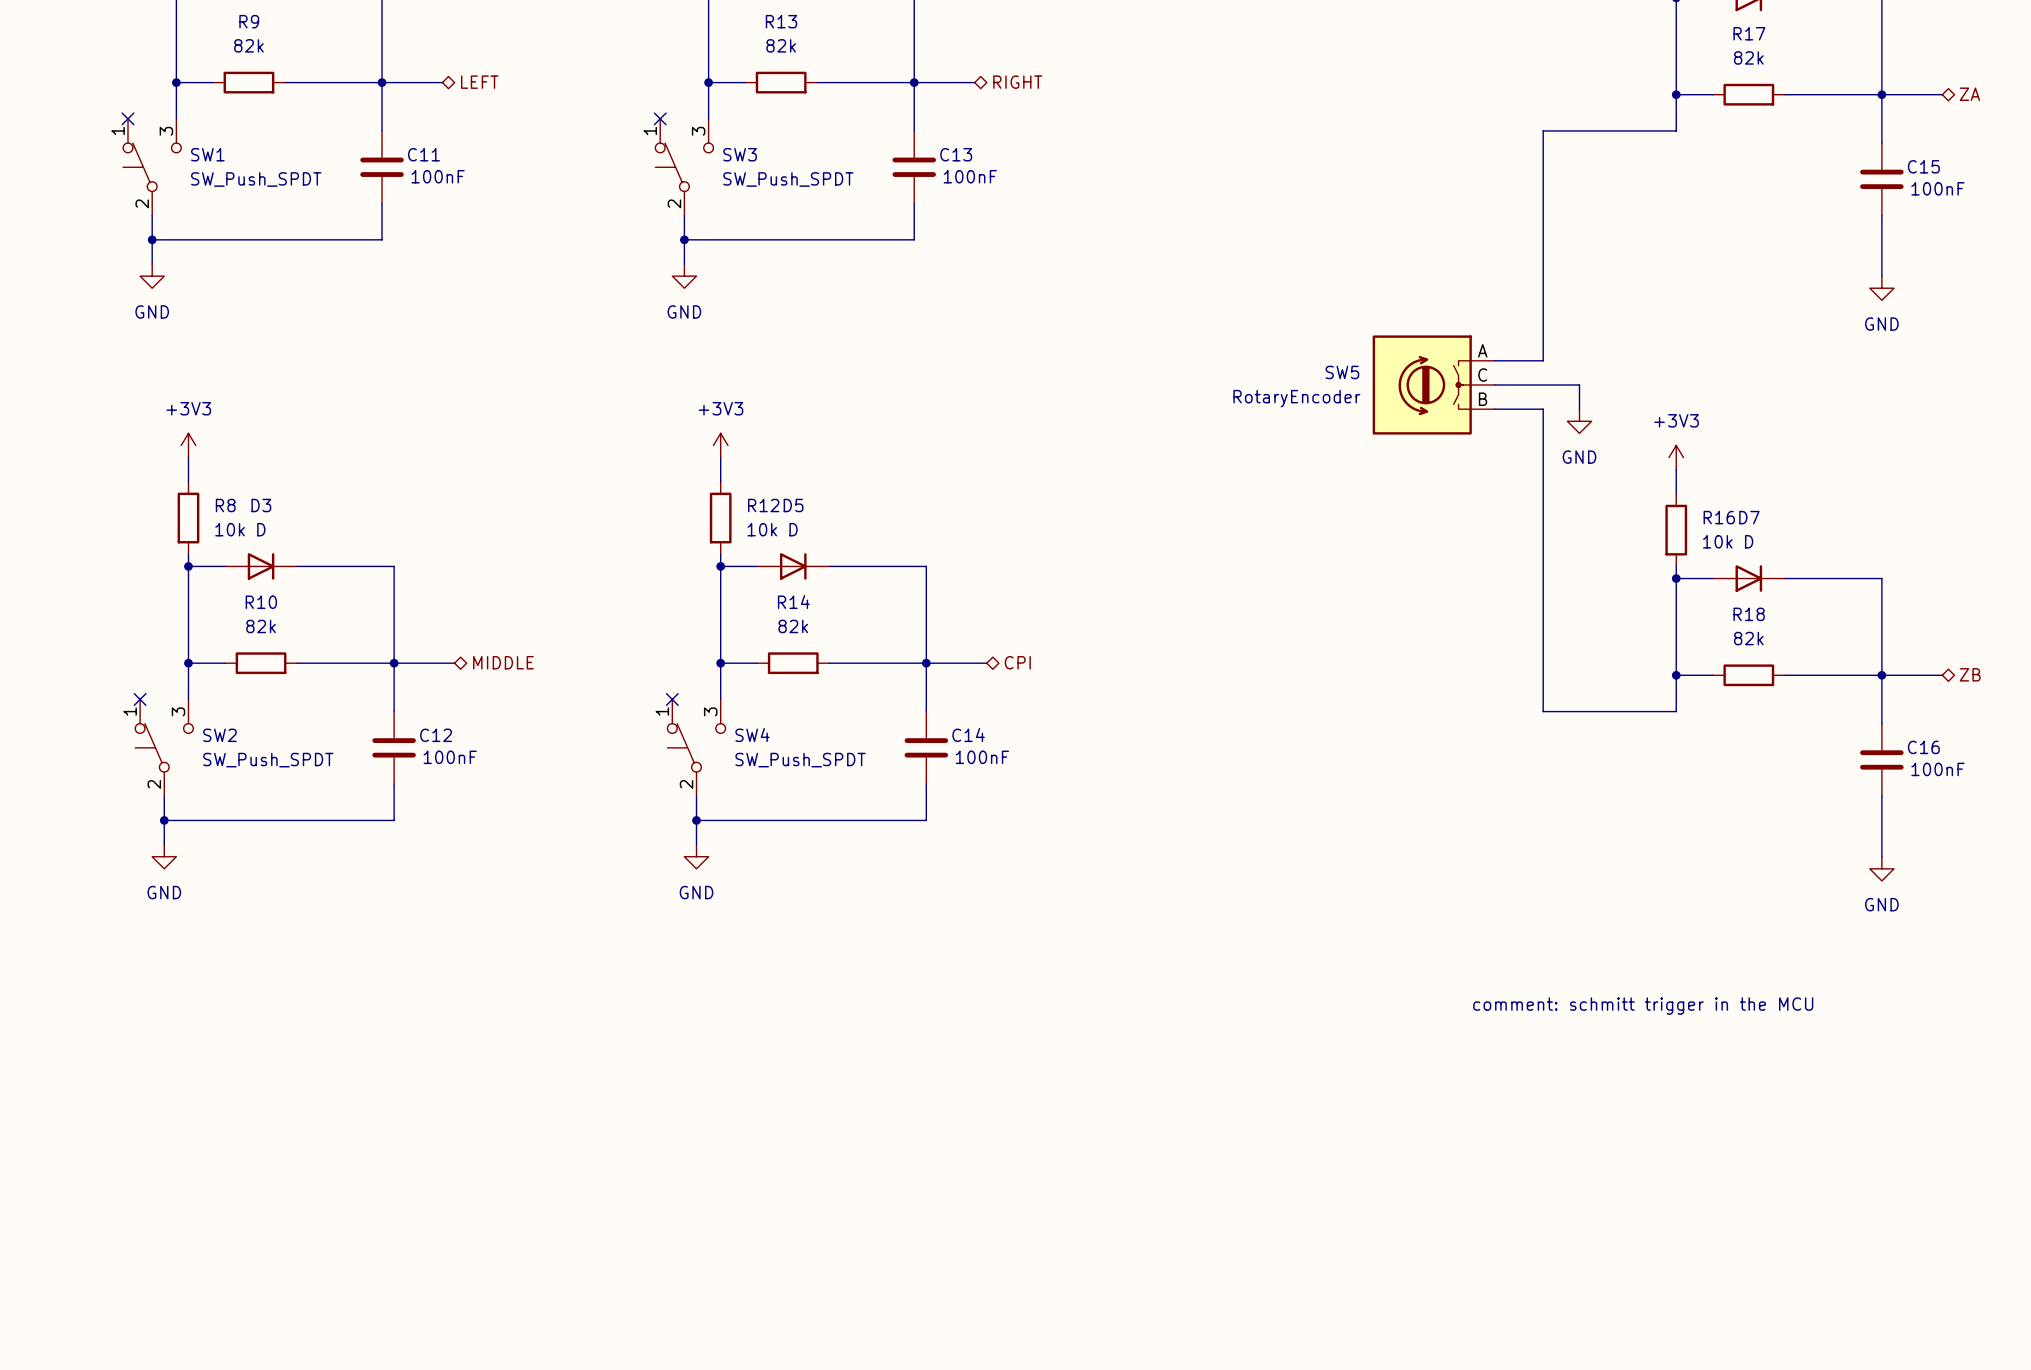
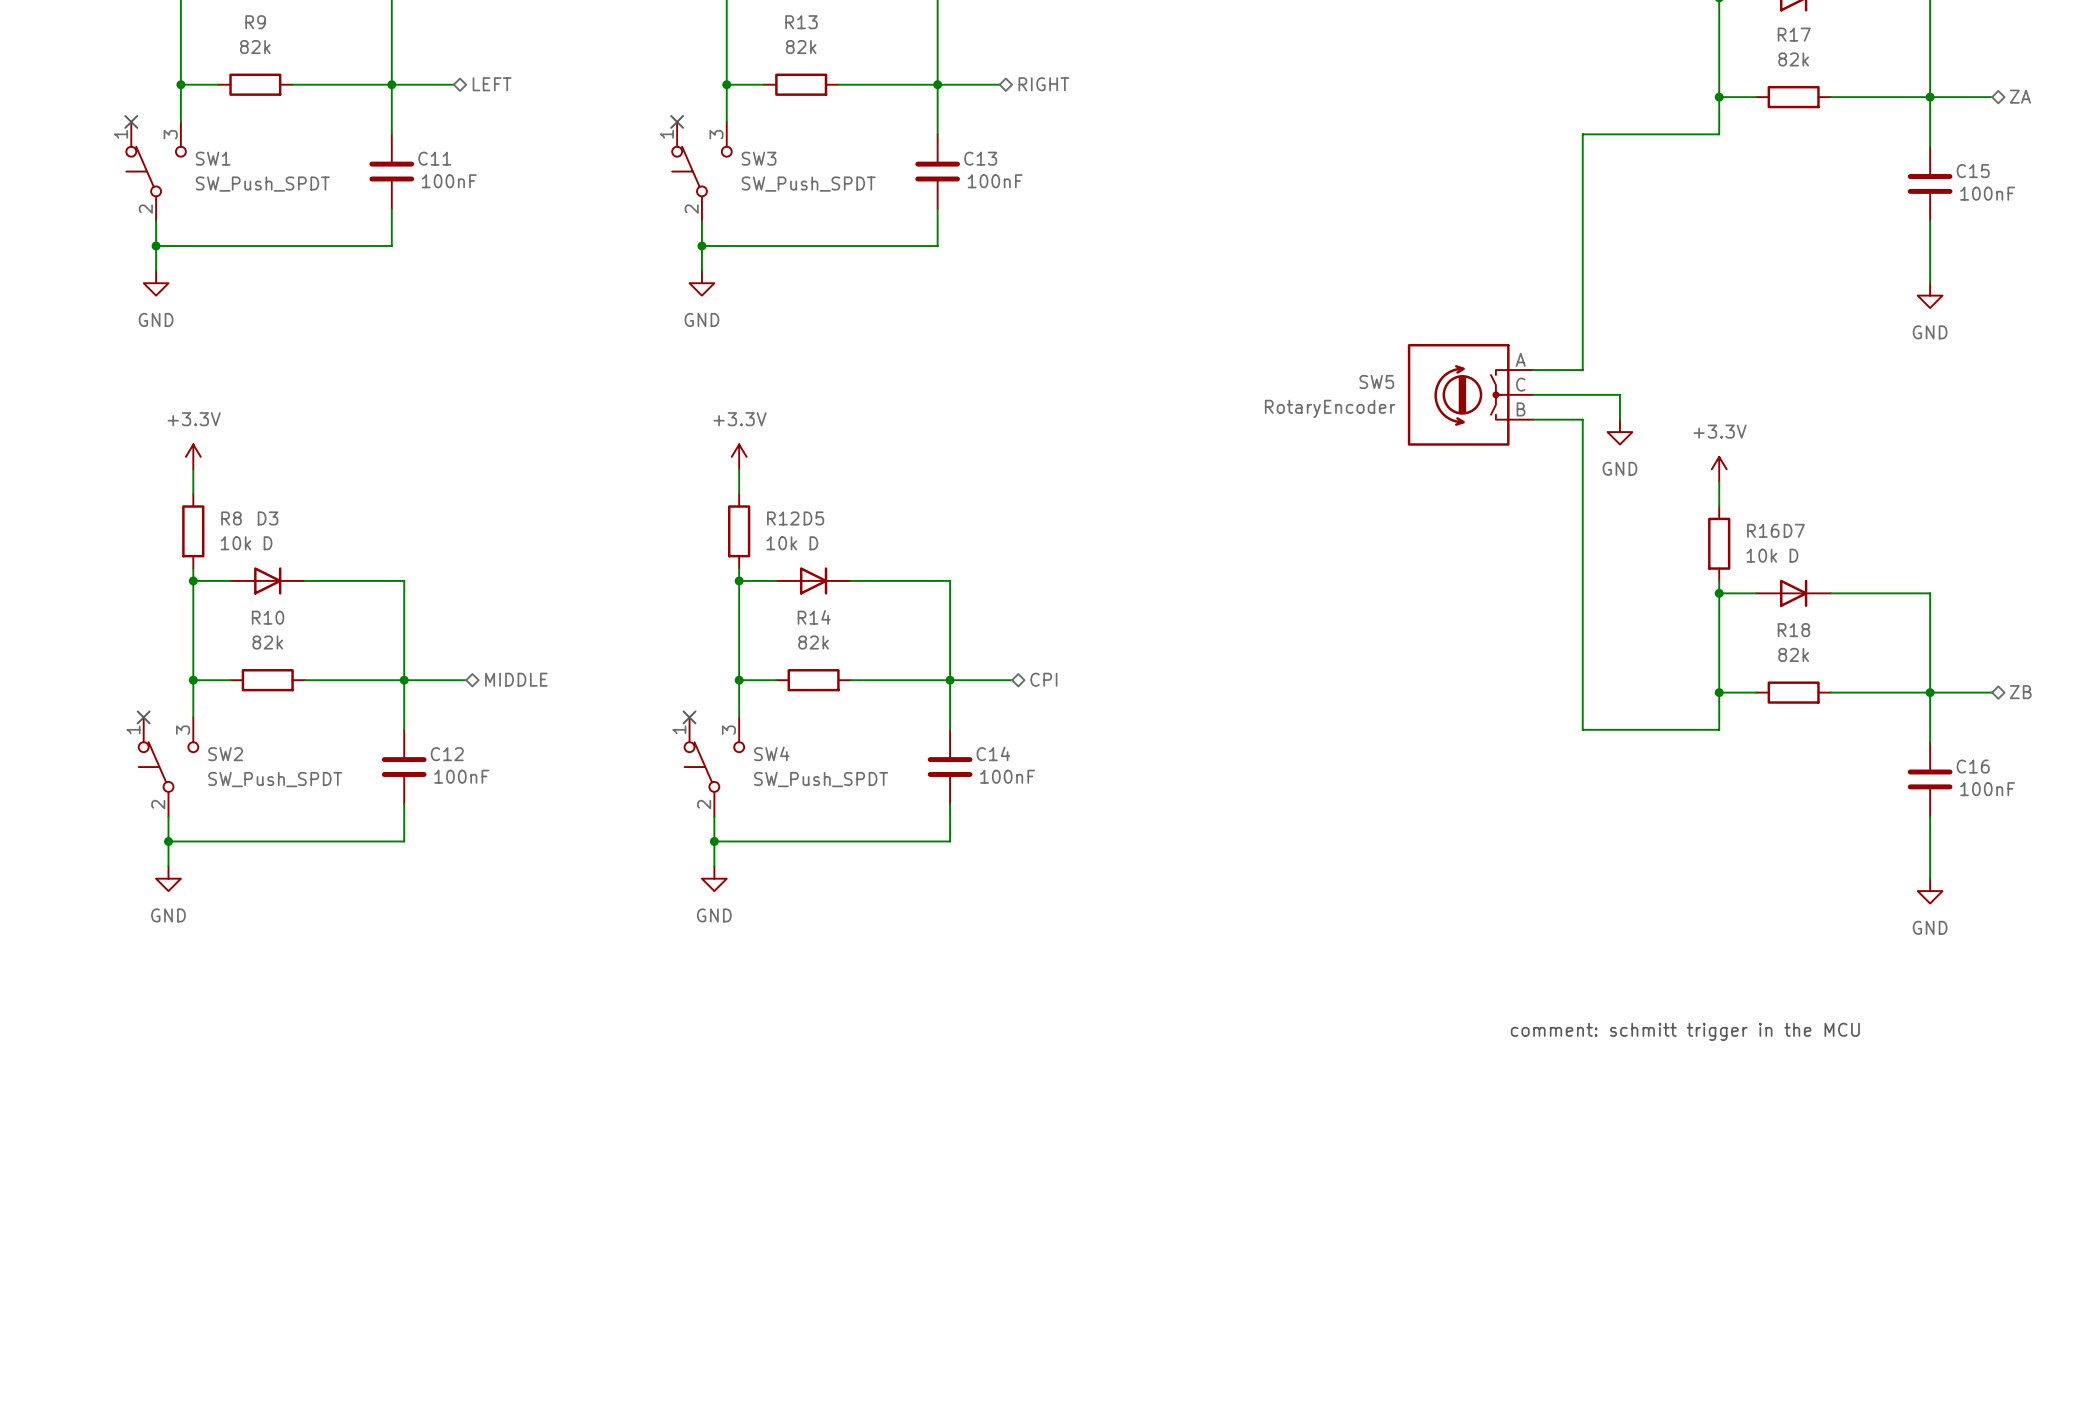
power symbol: +3V3 (188, 445) -> +3.3V (193, 456)
power symbol: +3V3 (720, 445) -> +3.3V (739, 456)
power symbol: +3V3 (1676, 457) -> +3.3V (1719, 469)

